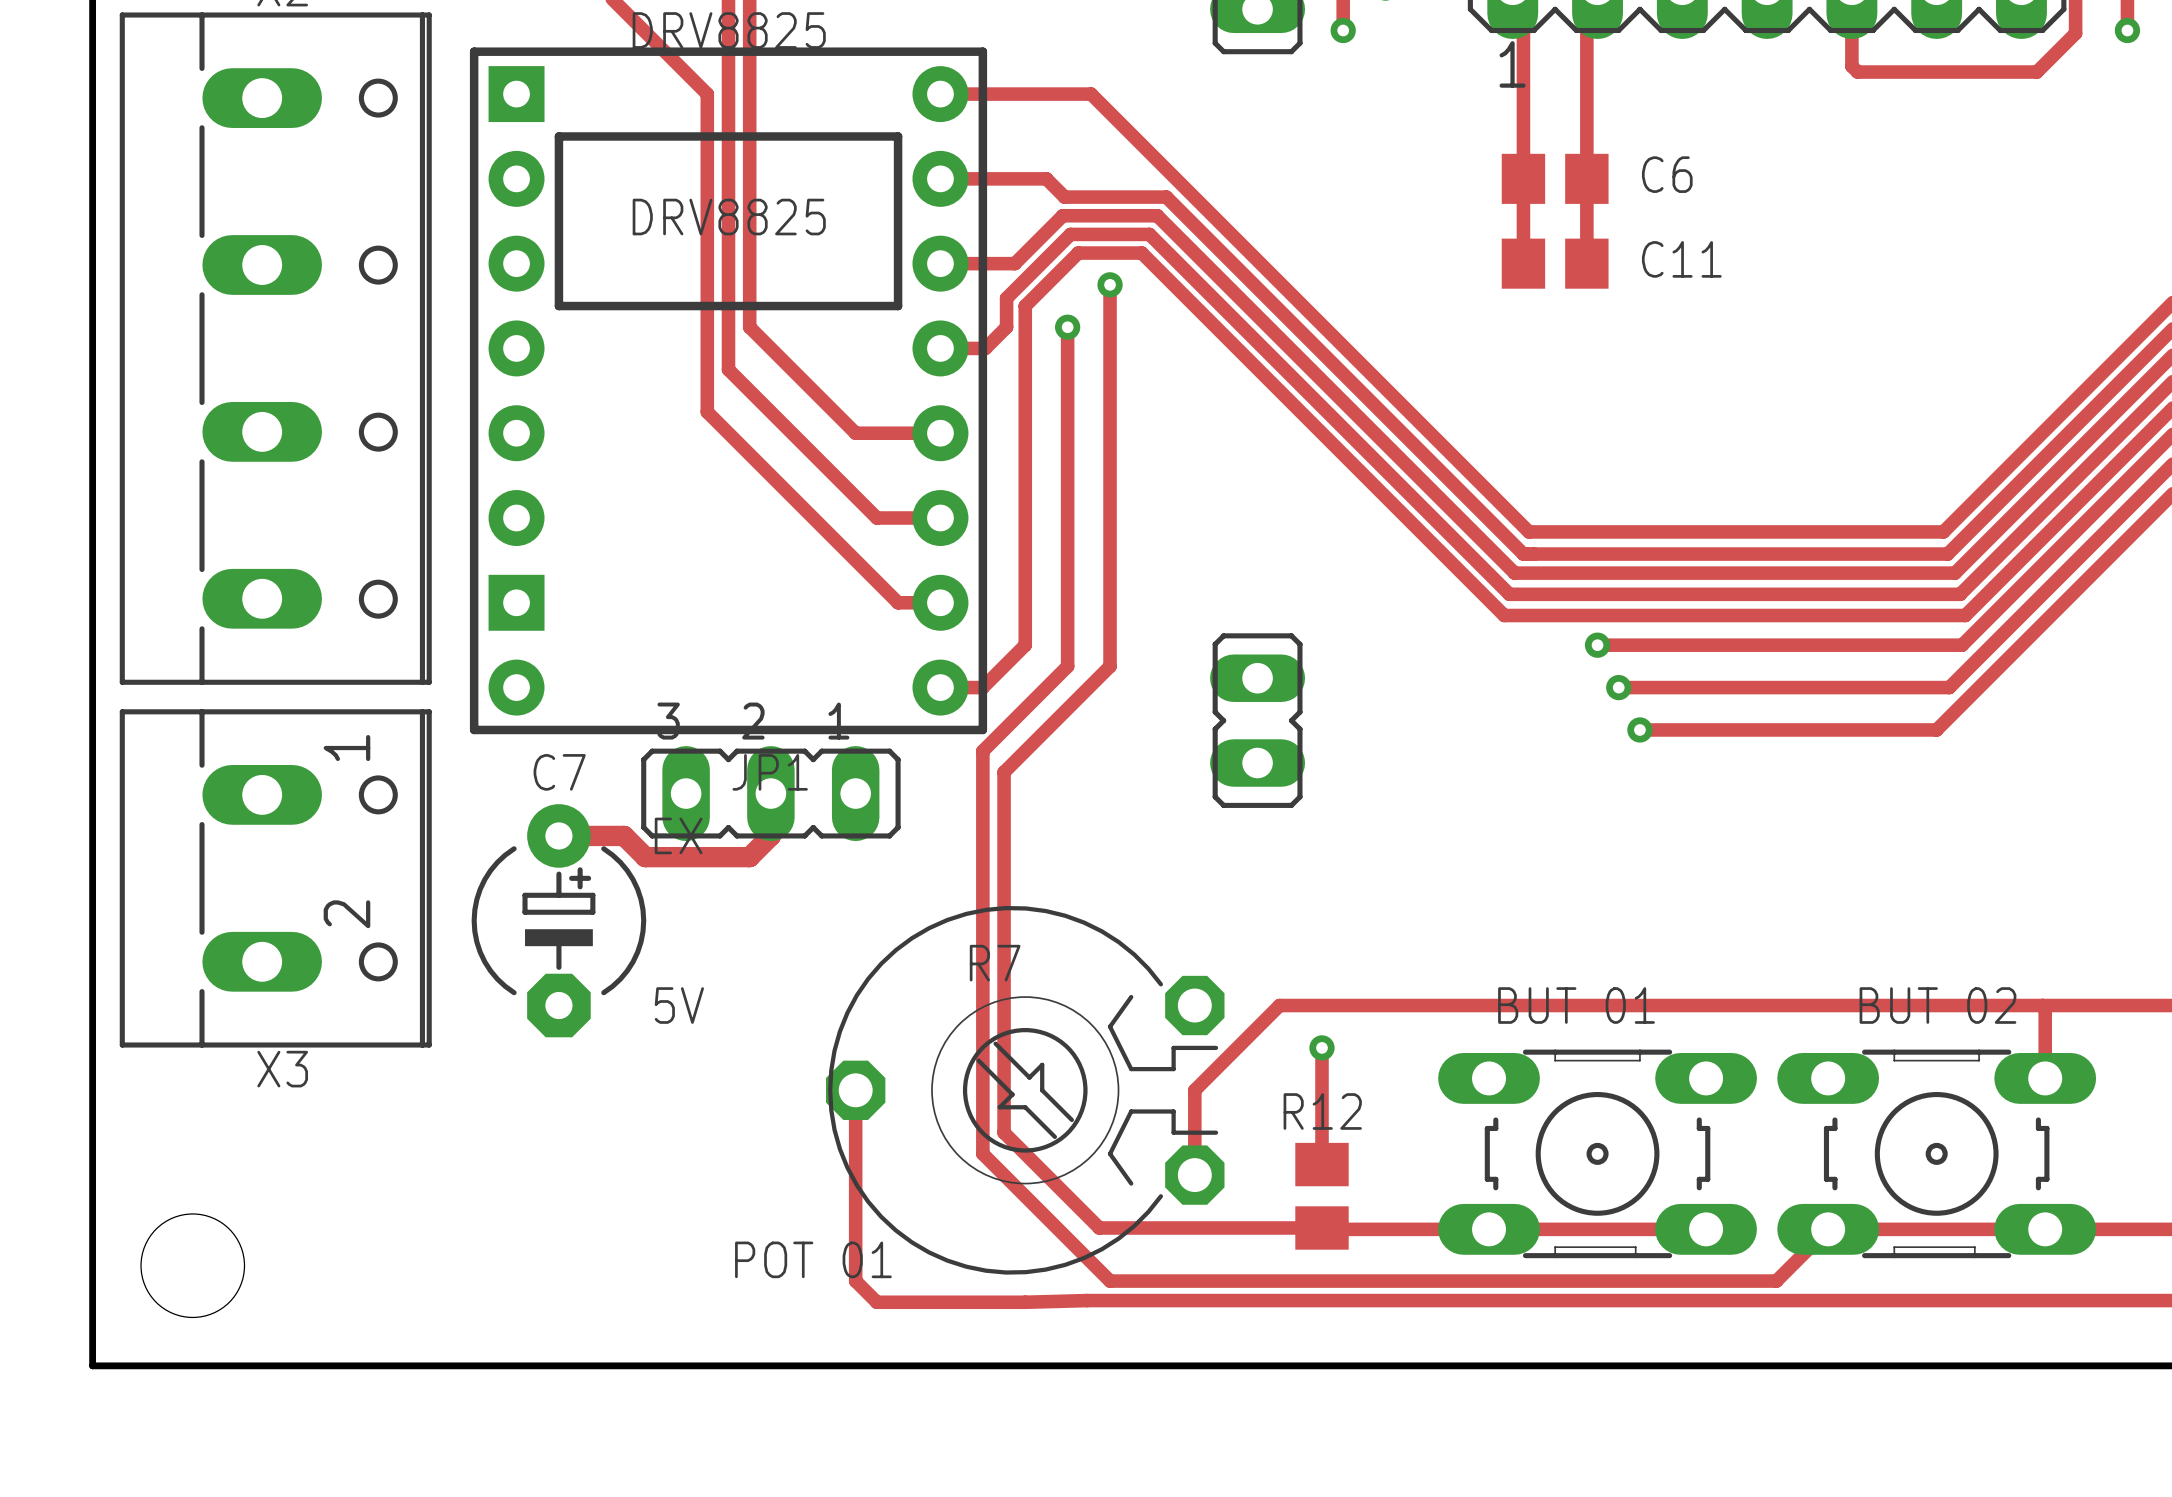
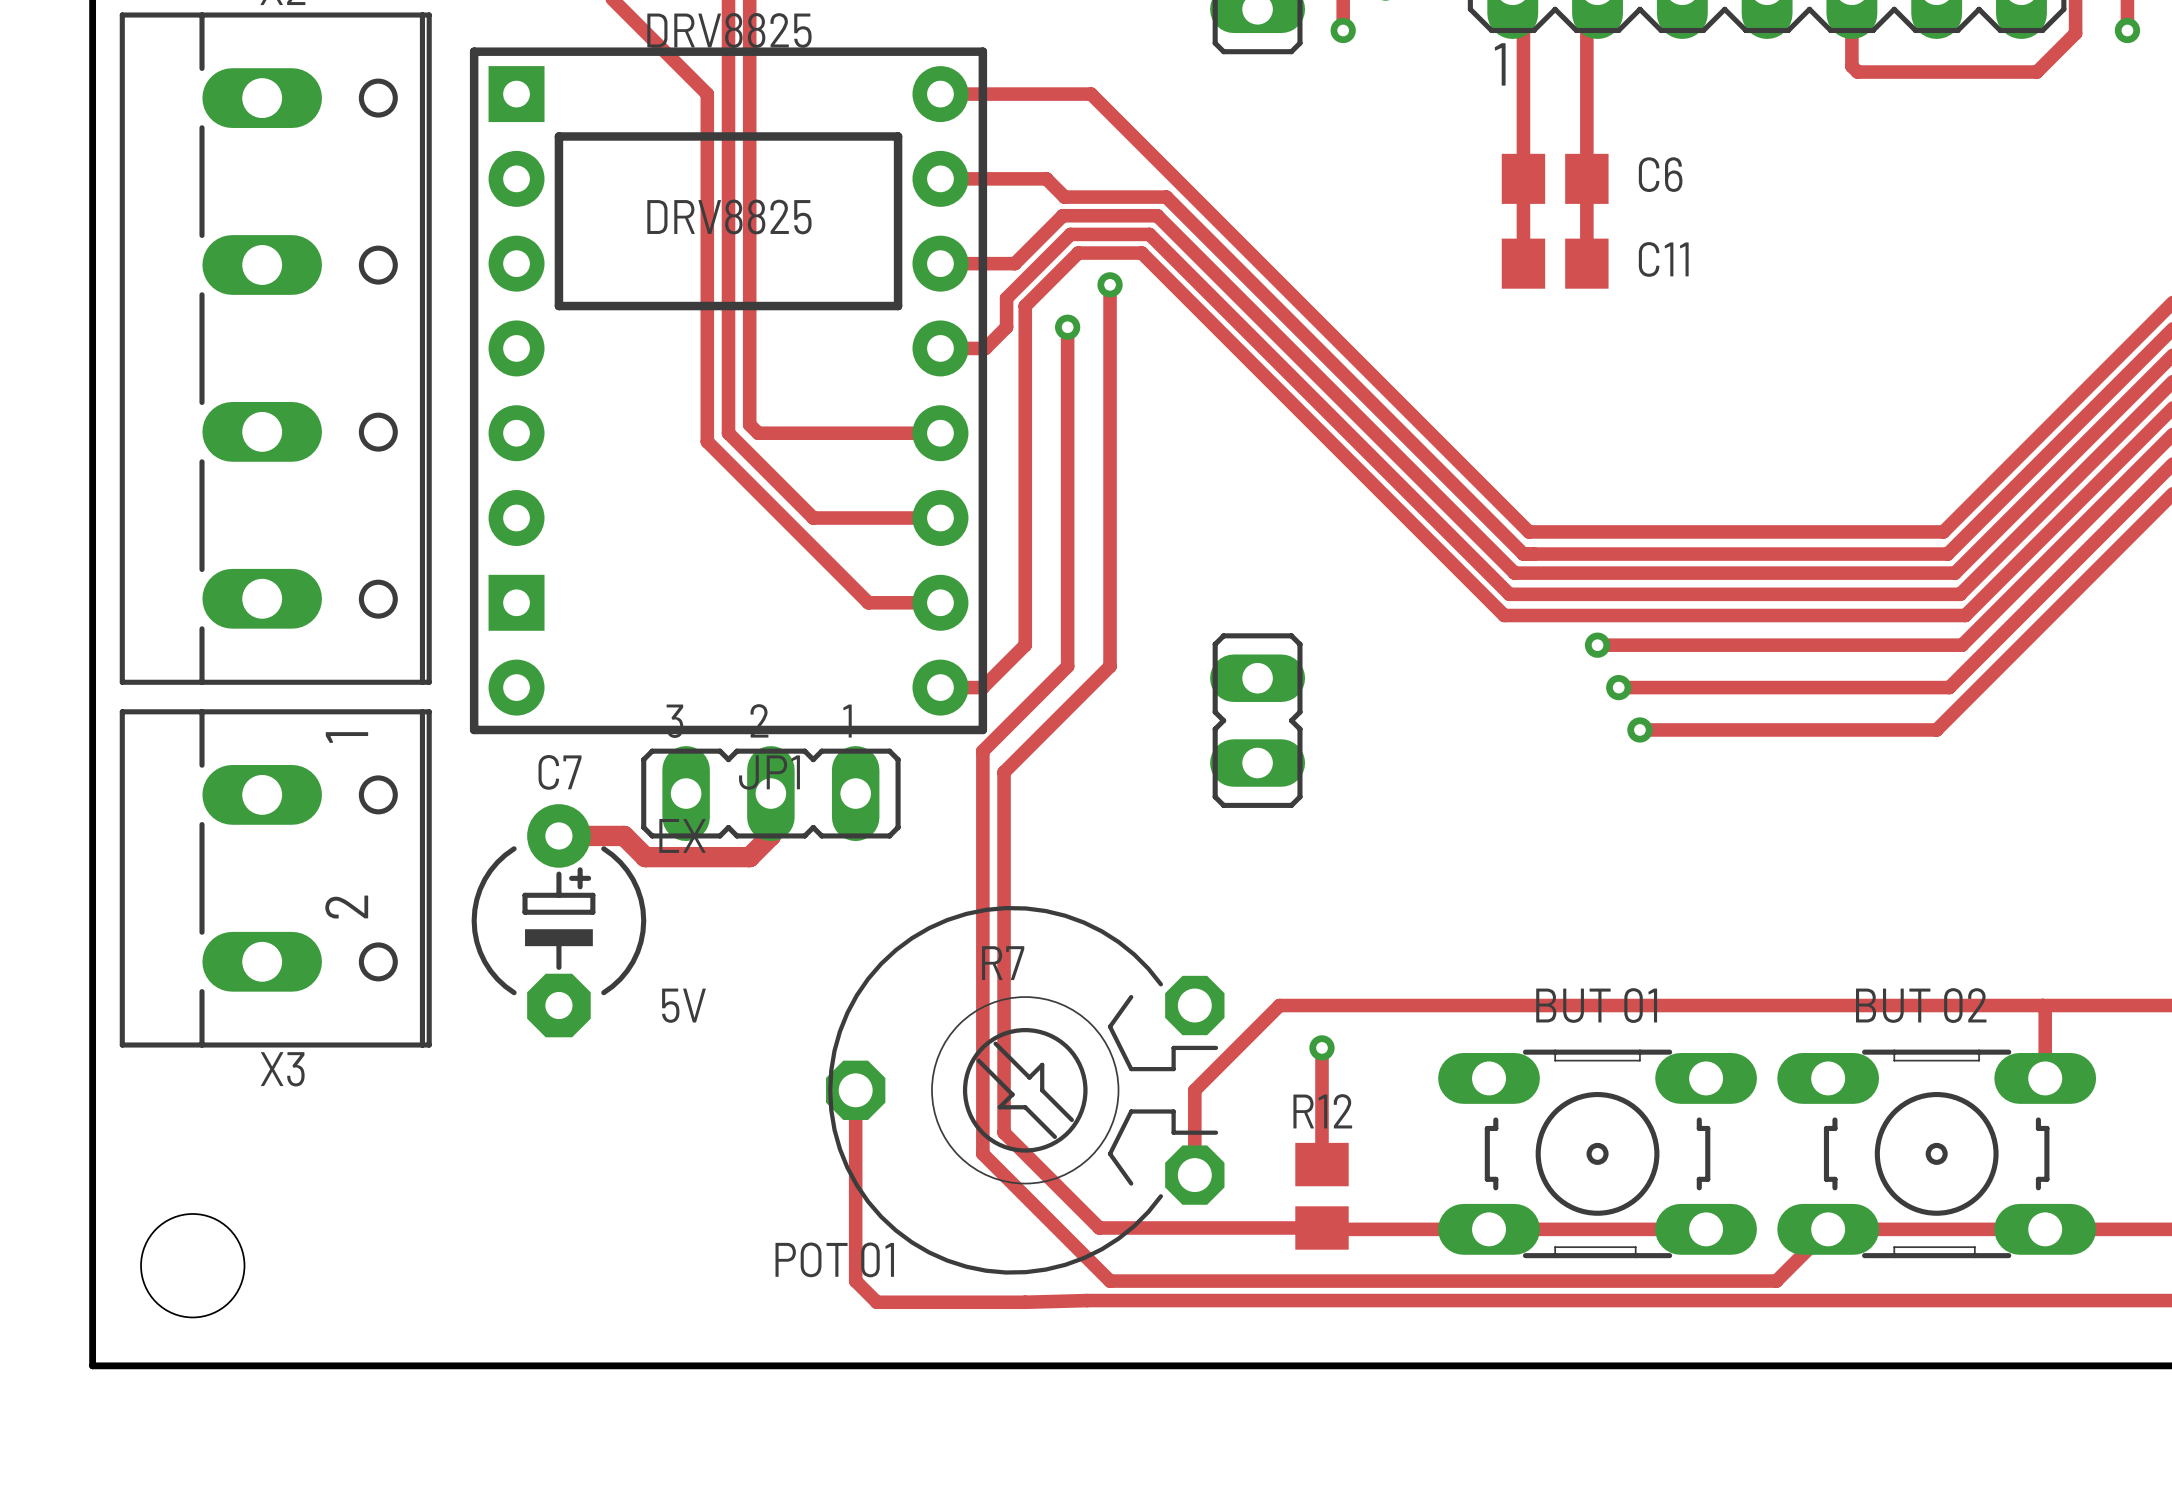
track: (749, 327) (855, 433) -> (749, 327) (749, 424) (758, 433) (855, 433)
track: (728, 369) (876, 518) -> none
track: (707, 412) (728, 433) -> (728, 369) (728, 433)
track: none -> (707, 412) (707, 441) (868, 602) (898, 602)
track: (813, 518) (898, 602) -> (813, 518) (876, 518)

